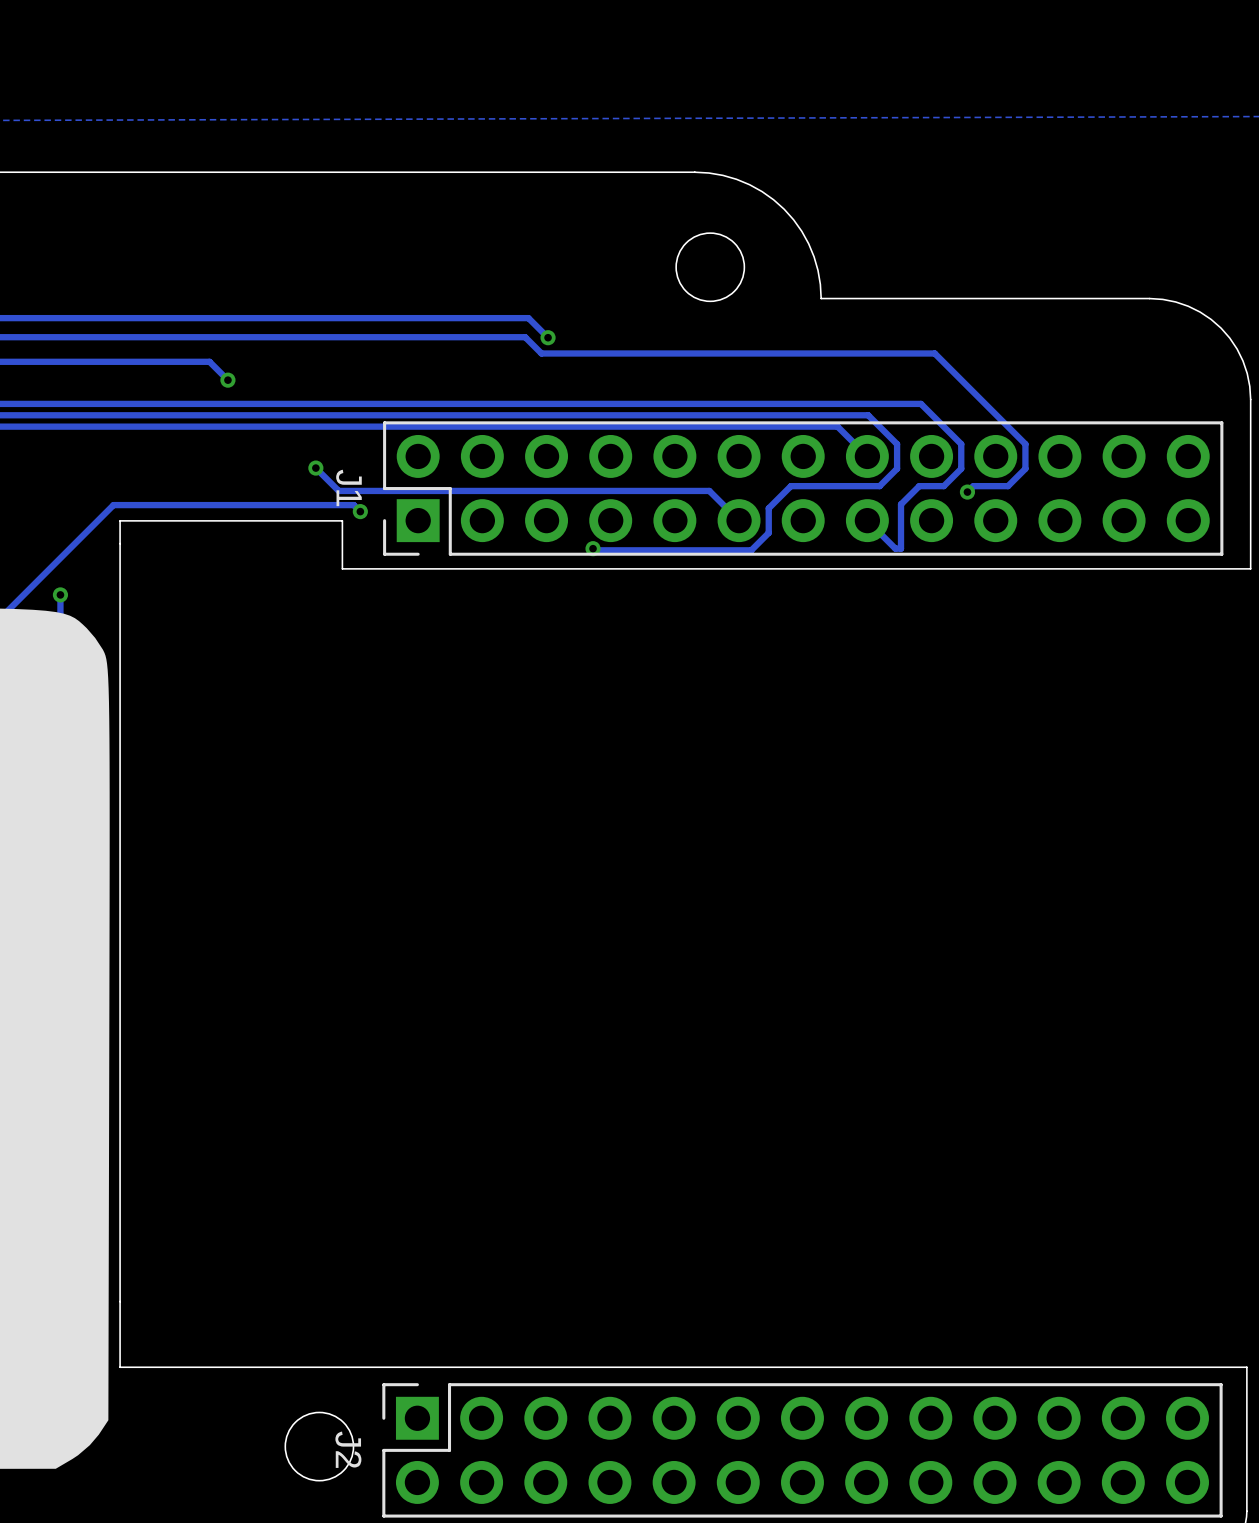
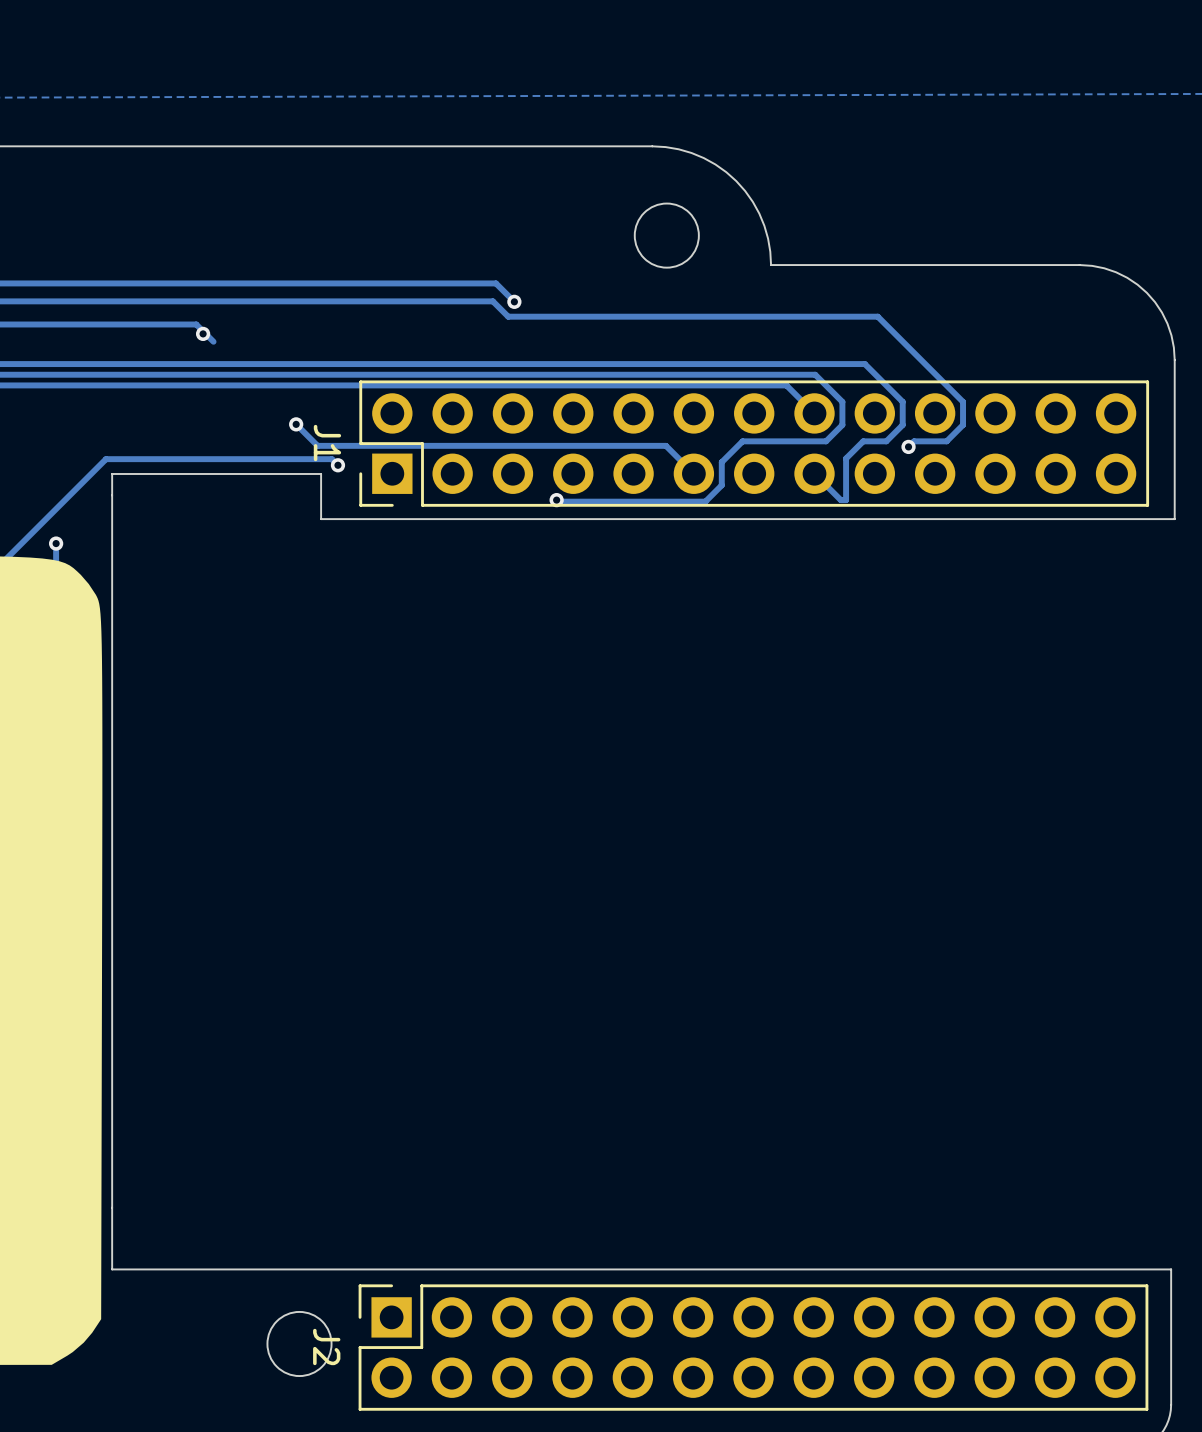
via position: (227, 380) -> (203, 333)

